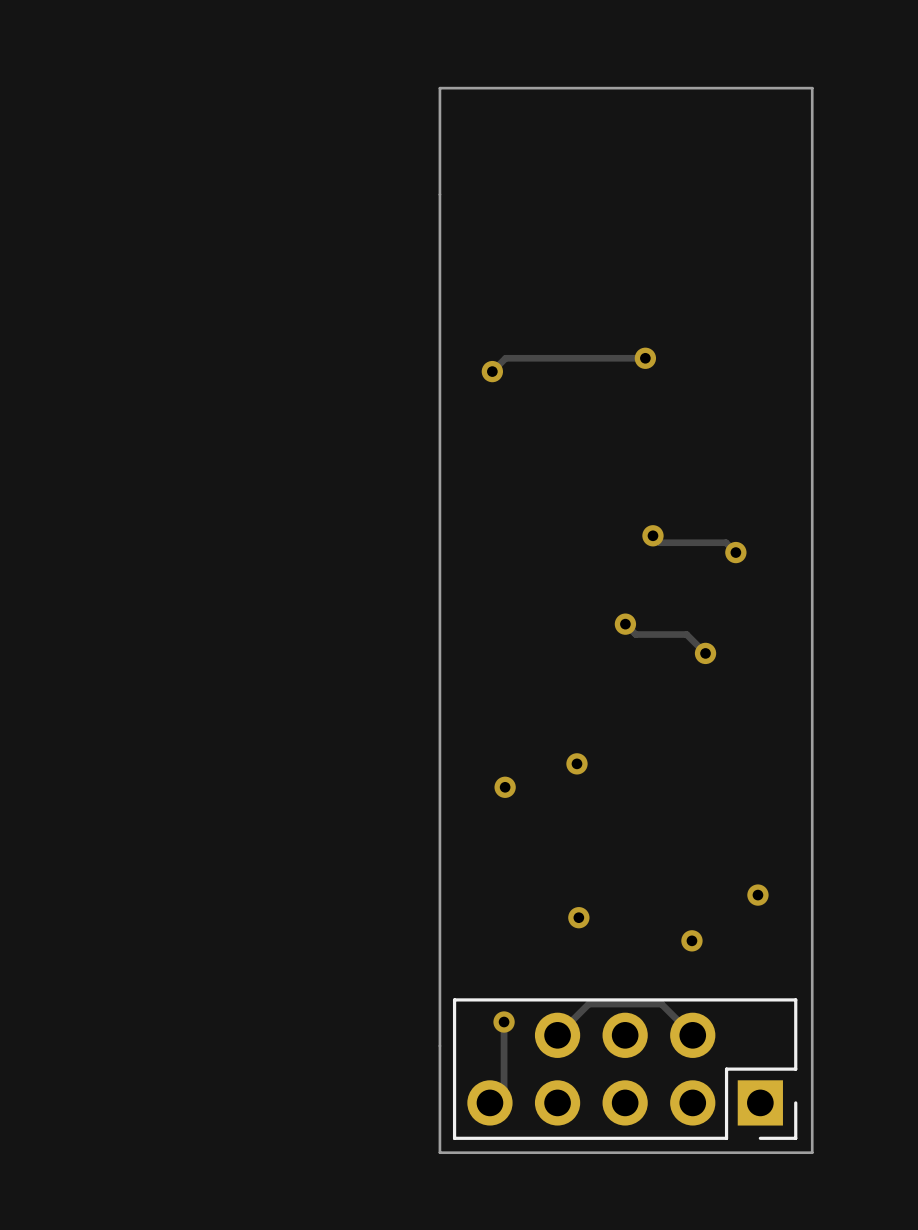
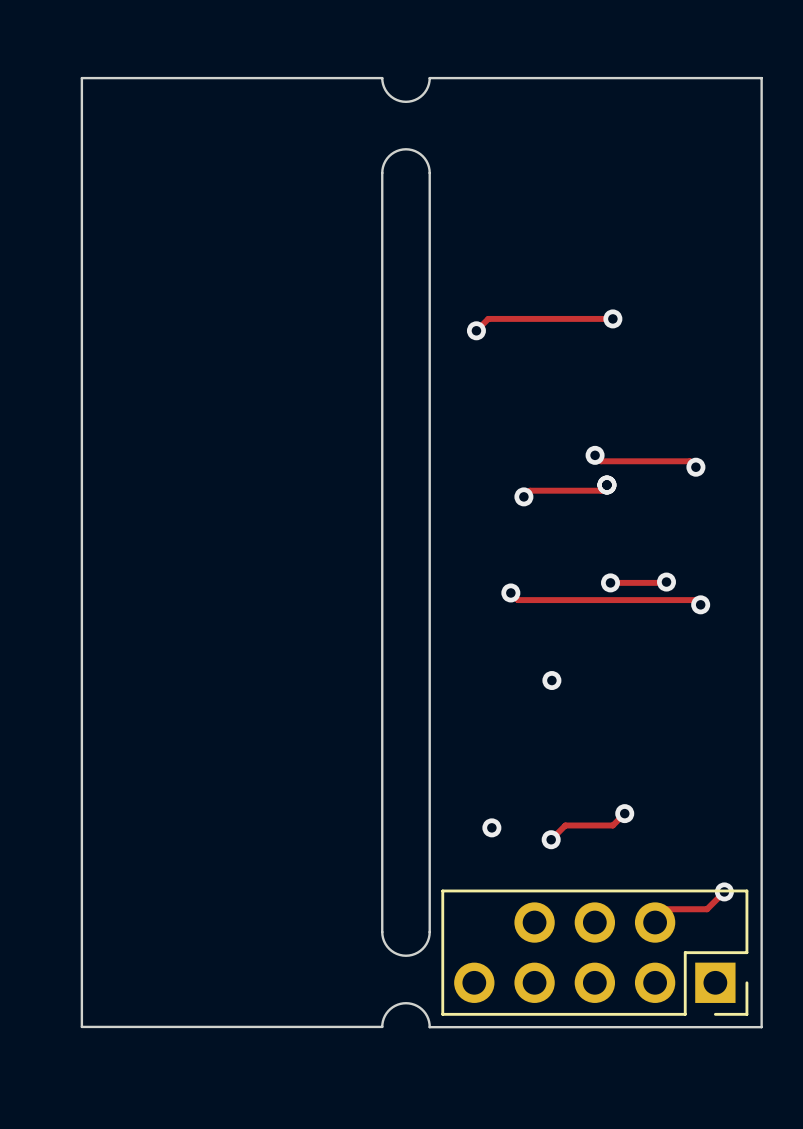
board edge: (439, 88) (439, 194) -> (429, 932) (427, 941) (422, 948) (415, 953) (405, 955) (396, 953) (389, 948) (384, 941) (382, 932) (382, 173) (384, 163) (389, 156) (396, 151) (405, 149) (415, 151) (422, 156) (427, 163) (429, 173)
track: none -> (595, 455) (601, 461) (689, 461) (695, 467)
via: none -> (595, 455)
track: (652, 535) (659, 542) (726, 542) (735, 552) -> none
via position: (652, 535) -> (606, 485)
track: none -> (606, 485) (601, 490) (530, 490) (523, 496)
via position: (735, 552) -> (695, 467)
via: none -> (523, 496)
track: (625, 624) (635, 634) (686, 634) (705, 653) -> none
via position: (625, 624) -> (610, 582)
track: none -> (610, 582) (669, 582)
track: none -> (510, 592) (517, 600) (695, 600) (700, 604)
via: none -> (510, 592)
via: none -> (700, 604)
via: (505, 787) -> none
via: (757, 895) -> none
track: none -> (624, 813) (612, 825) (565, 825) (551, 839)
via: none -> (624, 813)
via position: (578, 917) -> (551, 839)
via: none -> (491, 827)
via: (691, 940) -> none
track: none -> (724, 891) (707, 909) (654, 909)
via: none -> (724, 891)
track: (504, 1022) (504, 1088) (489, 1102) -> none
via: (504, 1022) -> none
track: (557, 1035) (588, 1004) (661, 1004) (692, 1035) -> none
board edge: (439, 1045) (439, 1152) -> (429, 78) (427, 87) (422, 94) (415, 100) (405, 101) (396, 100) (389, 94) (384, 87) (382, 78) (81, 78) (81, 1026) (382, 1026) (383, 1018) (388, 1011) (397, 1004) (406, 1003) (414, 1004) (421, 1009) (428, 1018) (429, 1027)

